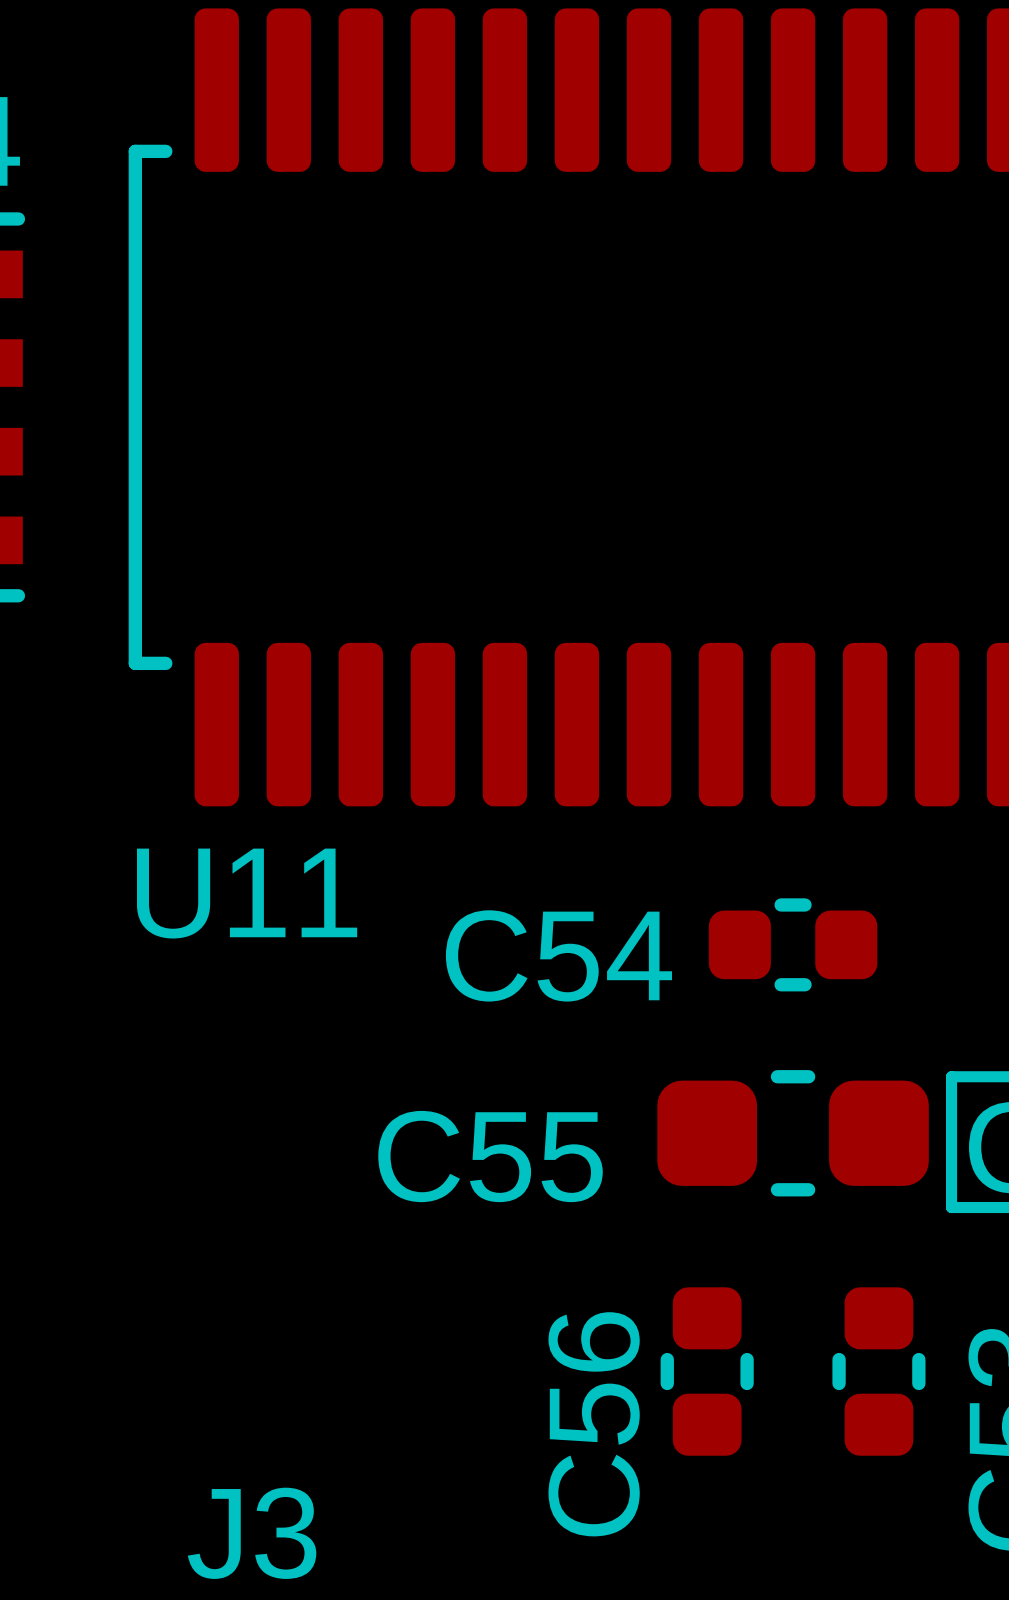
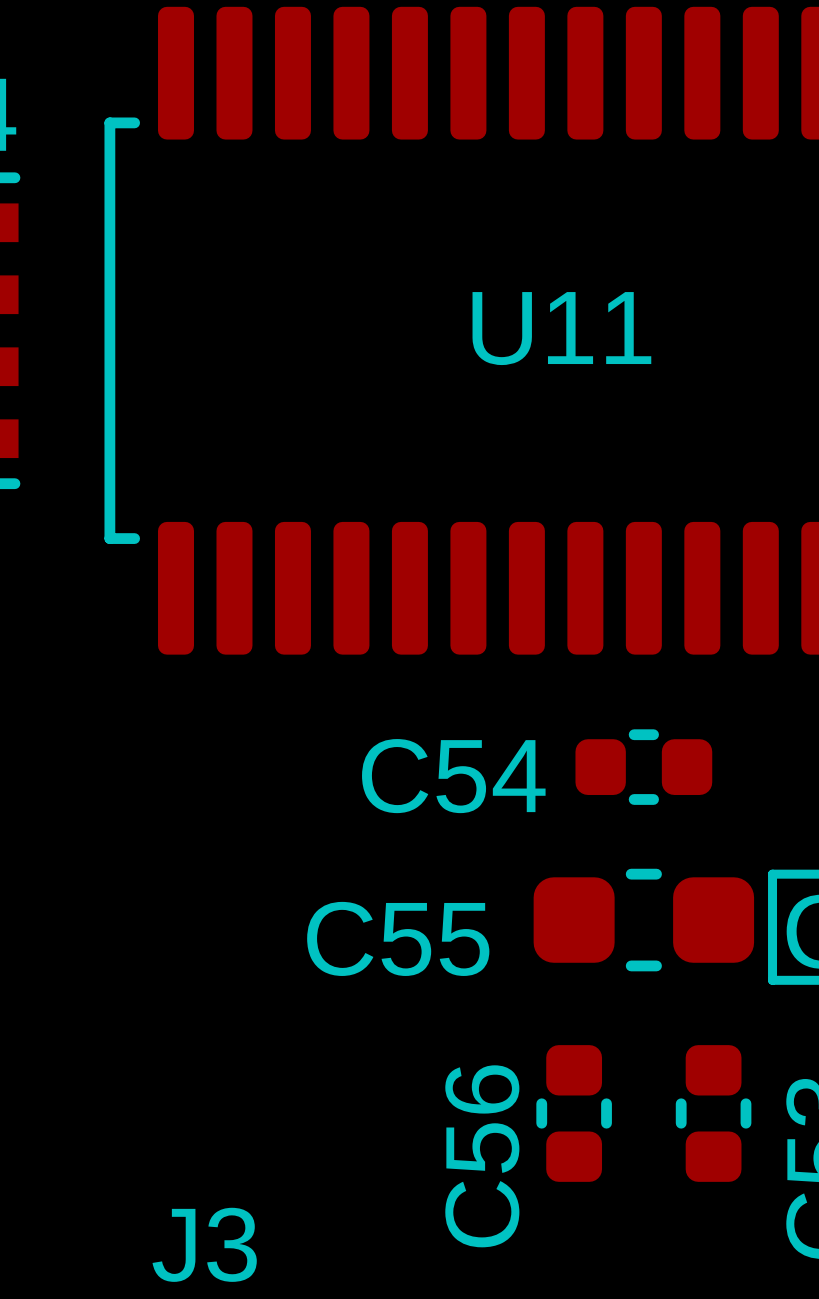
U11 name position: U11 (247, 893) -> U11 (561, 328)

